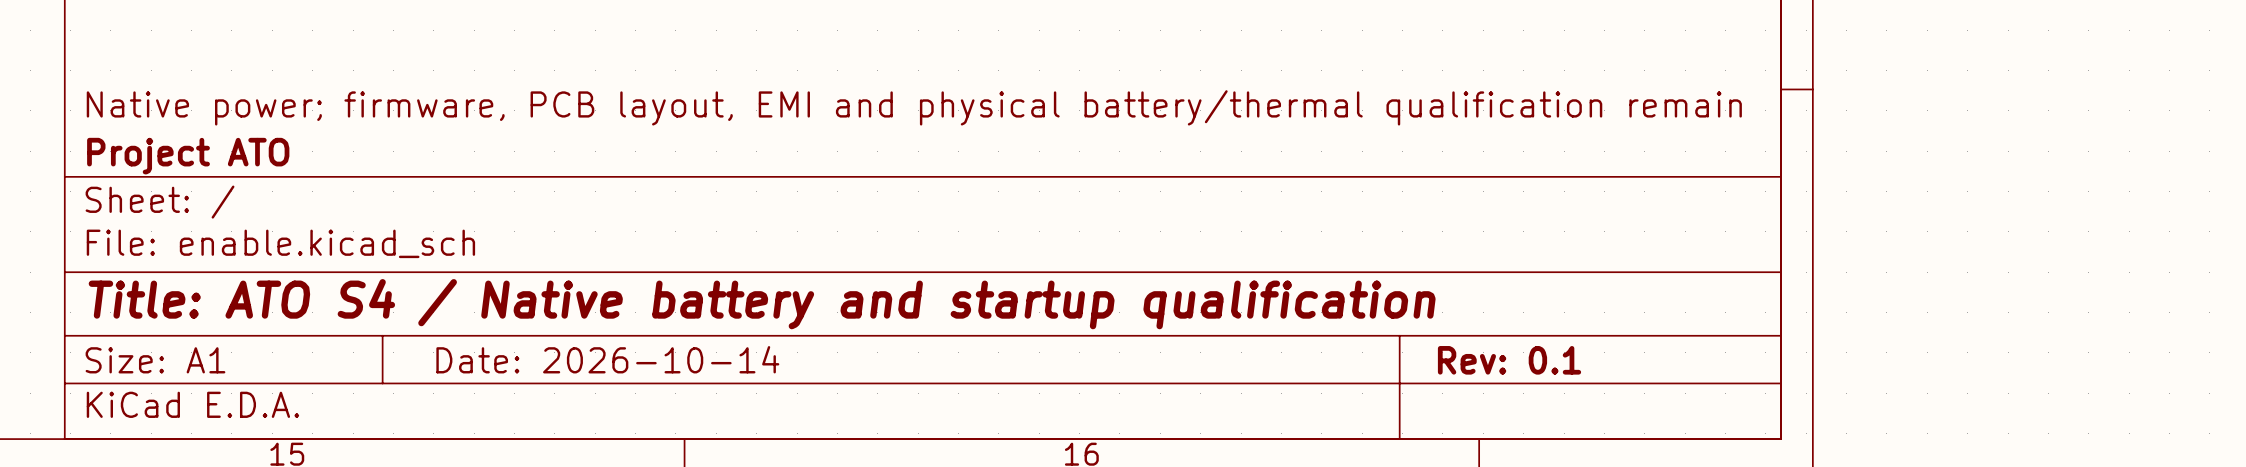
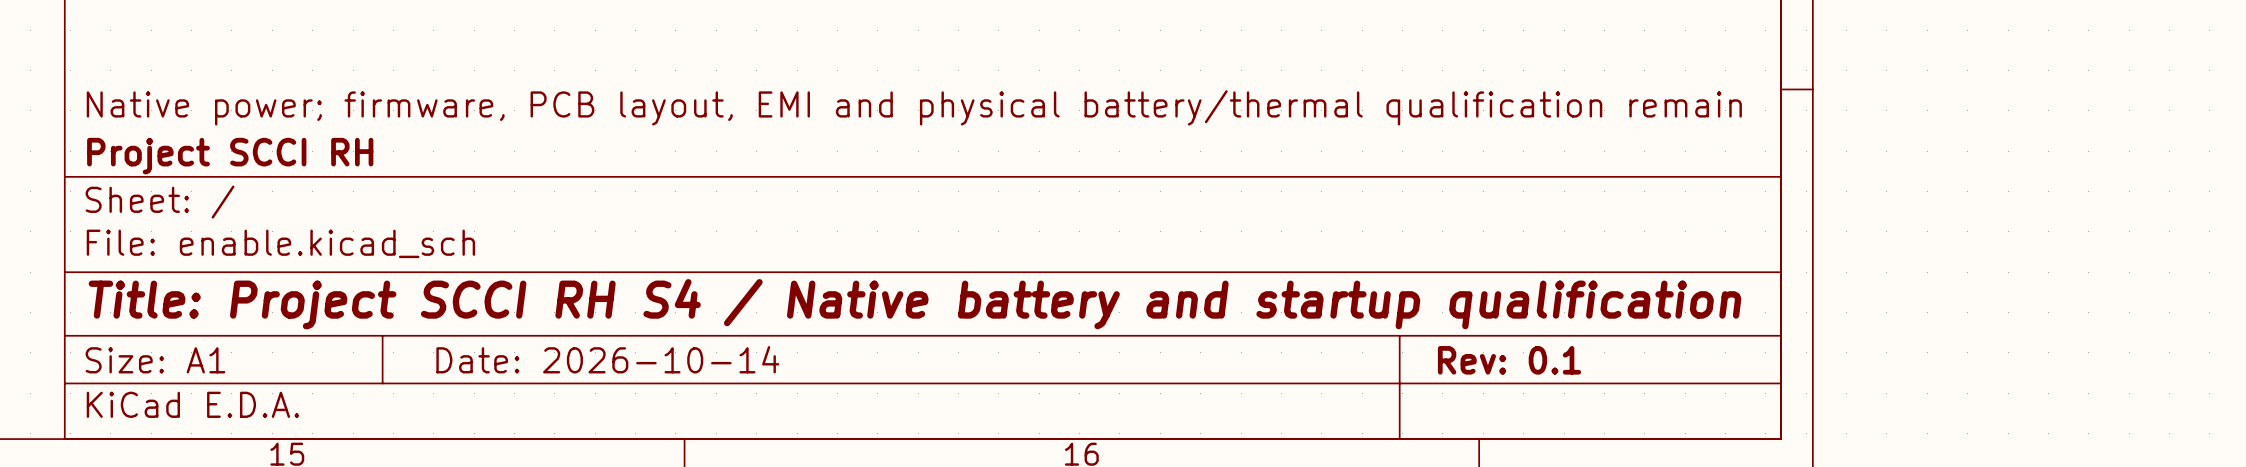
title block: Project ATO (188, 156) -> Project SCCI RH (230, 156)
title block: Title: ATO S4 / Native battery and startup qualification (762, 304) -> Title: Project SCCI RH S4 / Native battery and startup qualification (915, 304)

